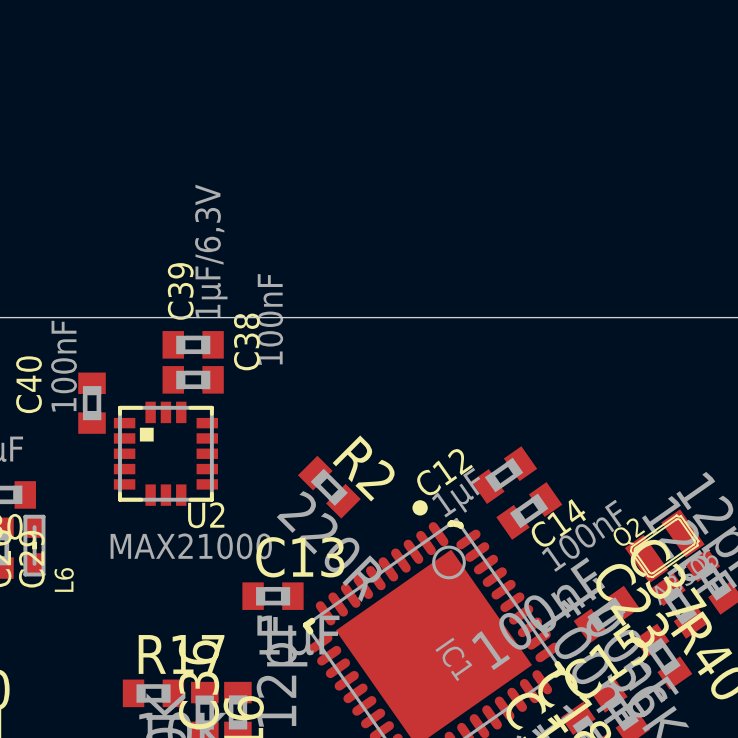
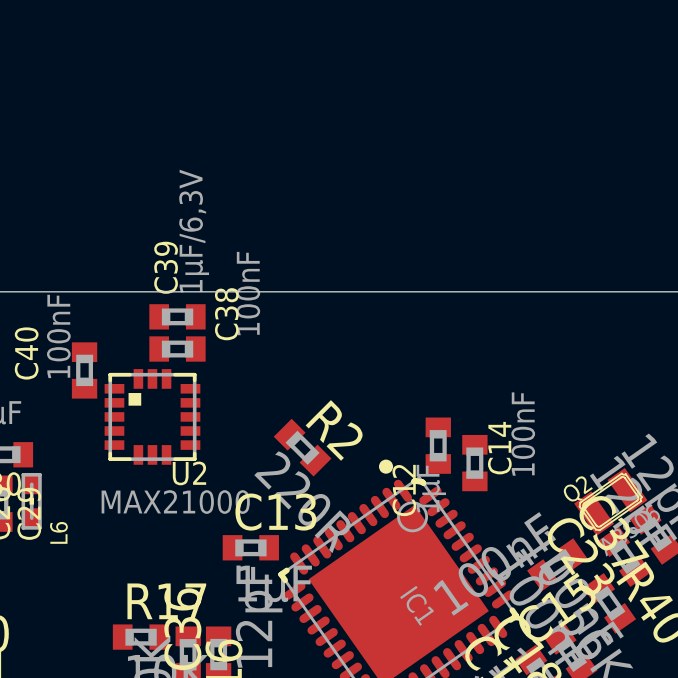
C12 rotation: 0° (504, 475) -> 55° counterclockwise (438, 445)
C14 rotation: 0° (529, 510) -> 55° counterclockwise (474, 463)

